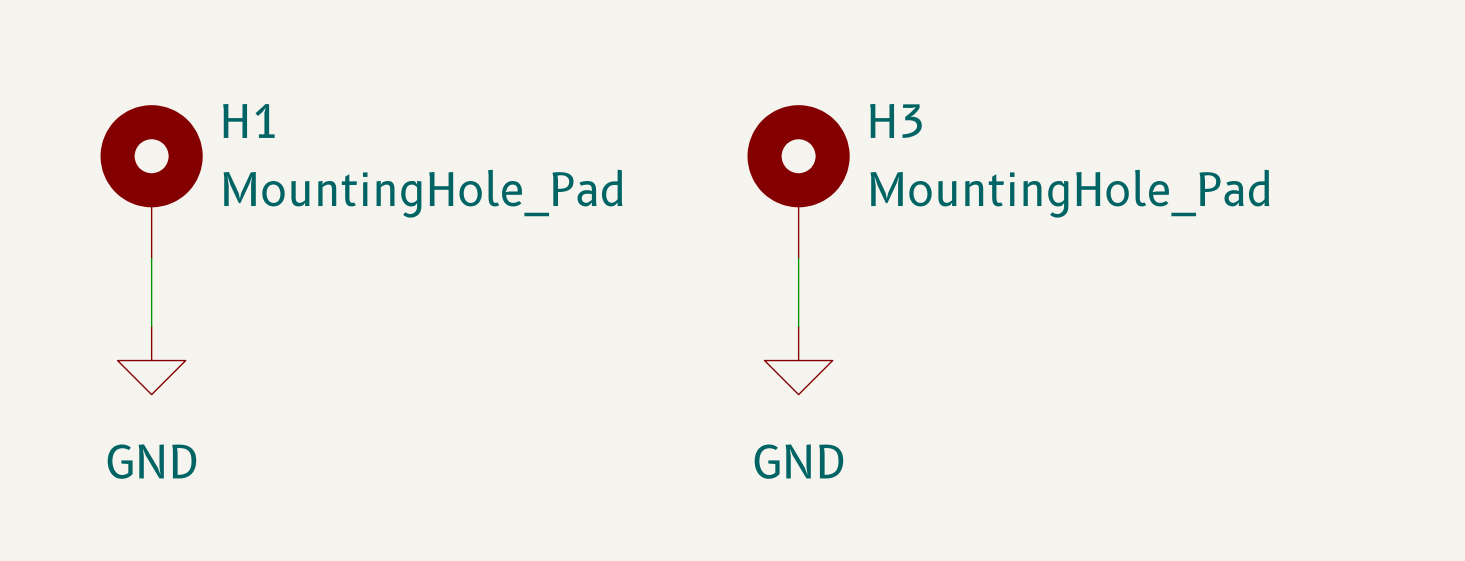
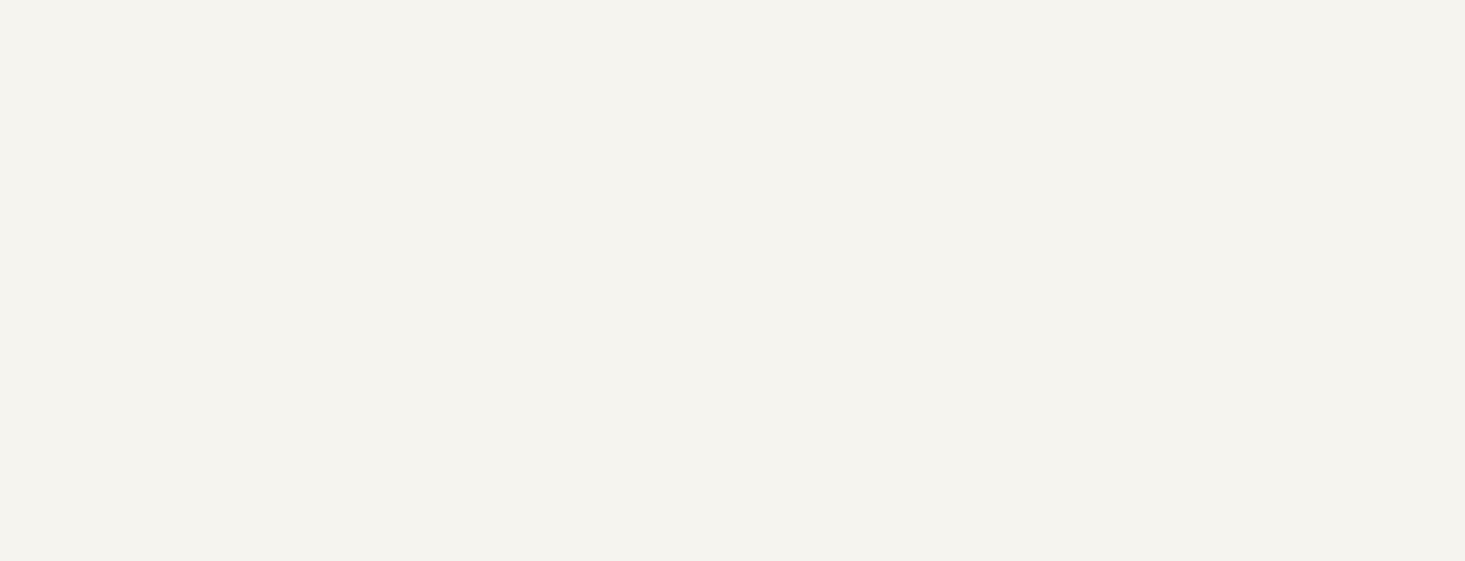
H1: MountingHole_Pad (151, 181) -> none
H3: MountingHole_Pad (798, 181) -> none
wire: (151, 258) (151, 326) -> none
wire: (798, 258) (798, 326) -> none
power symbol: GND (151, 360) -> none
power symbol: GND (798, 360) -> none

